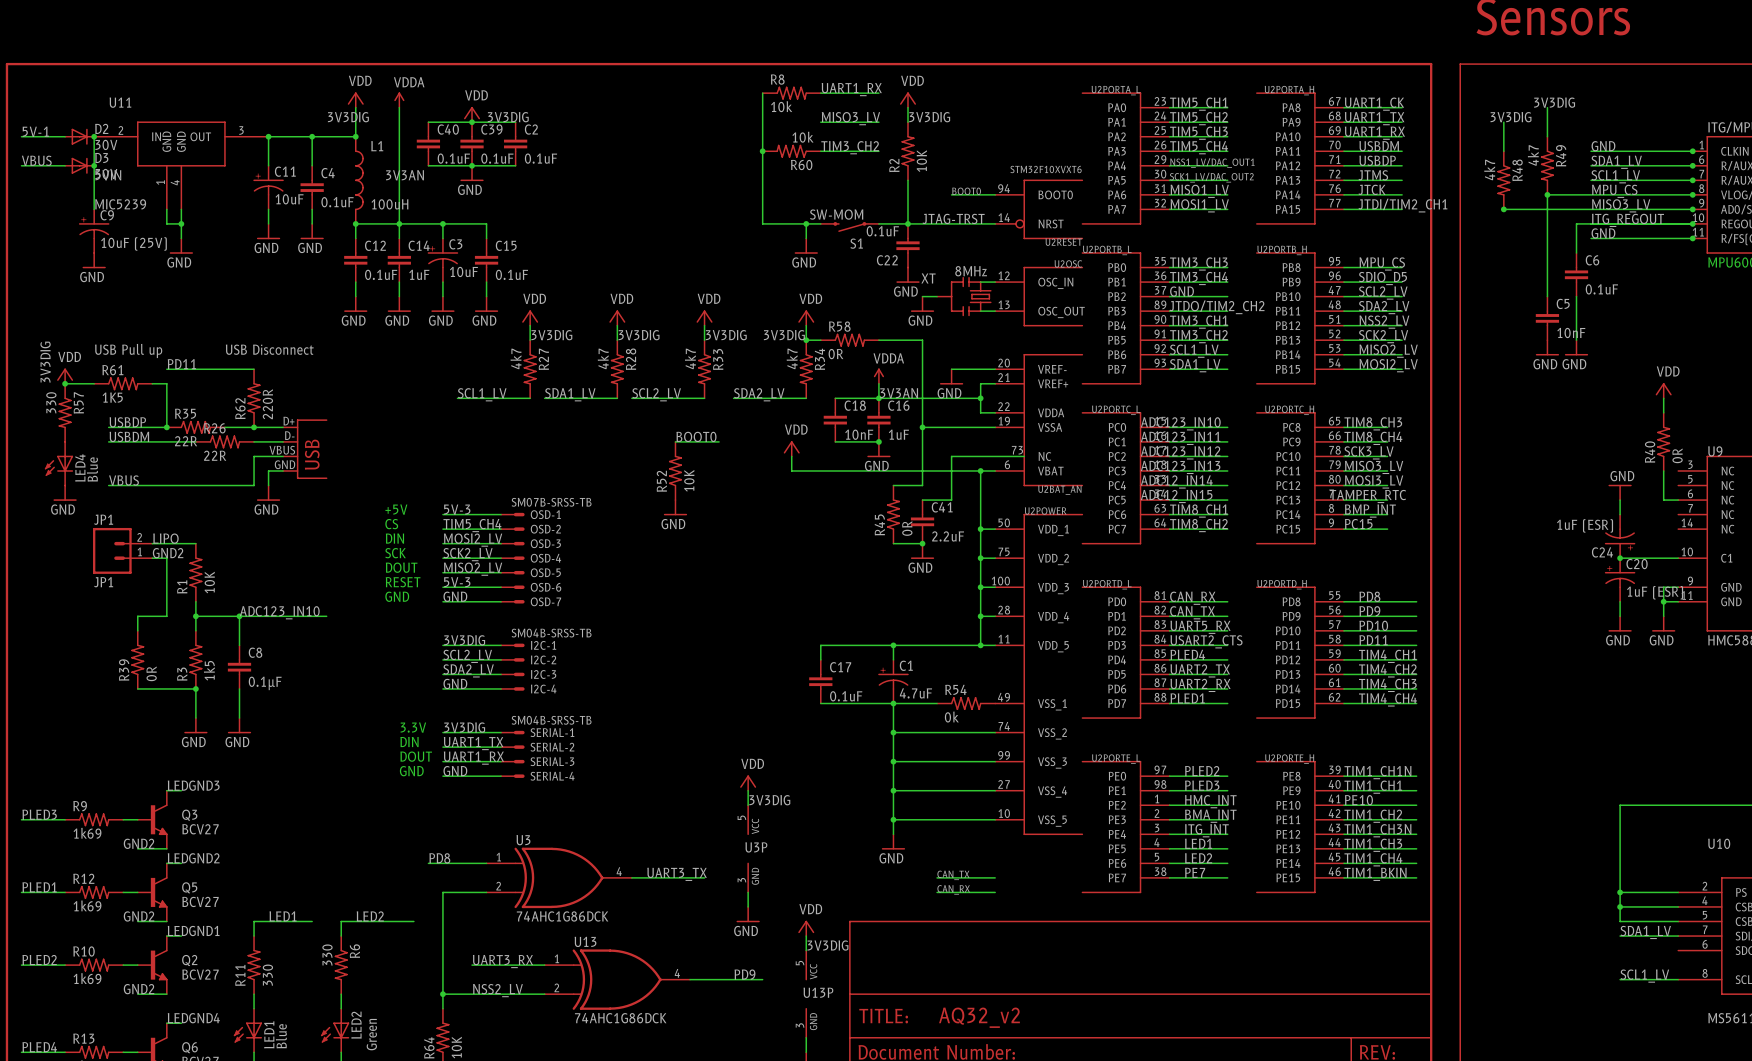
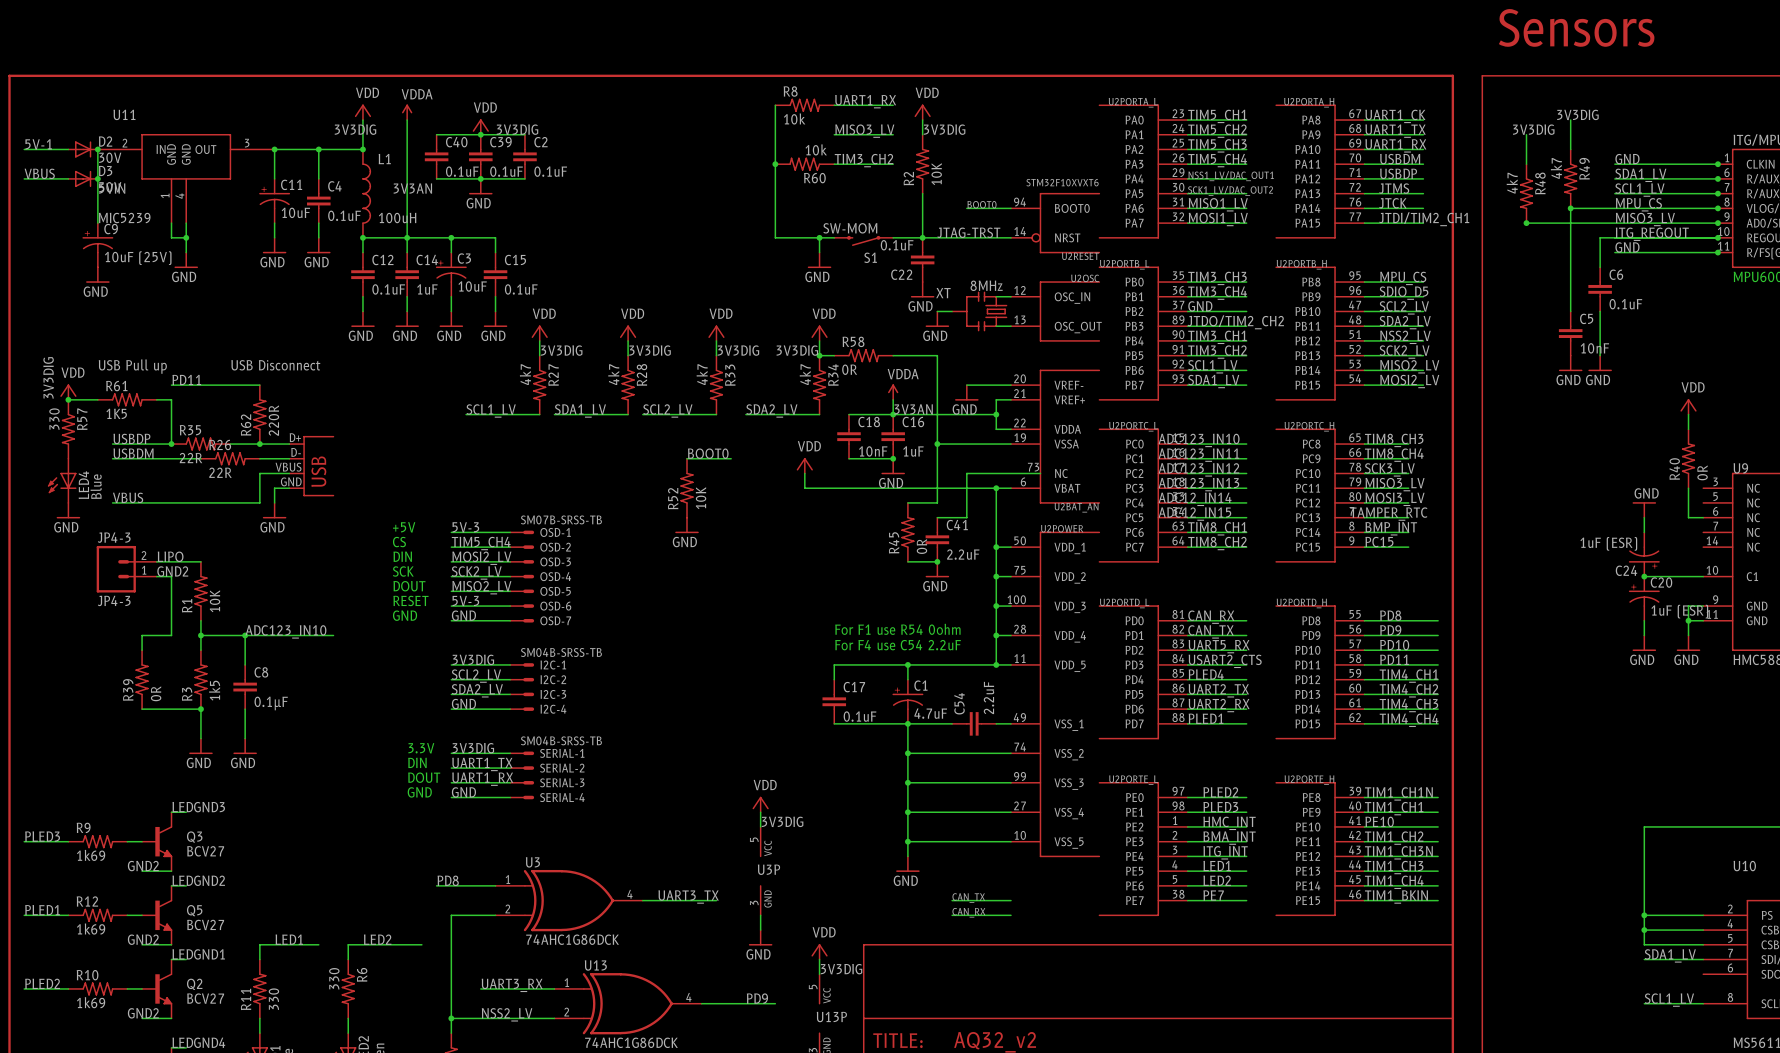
JP1 name: JP1 (103, 519) -> JP4-3 (114, 537)
JP1 value: JP1 (103, 582) -> JP4-3 (114, 600)
text: none -> For F1 use R54 0ohm (897, 629)
text: none -> For F4 use C54 2.2uF (898, 645)
C54: none -> 2.2uF (974, 723)
R54: 0k (966, 703) -> none

